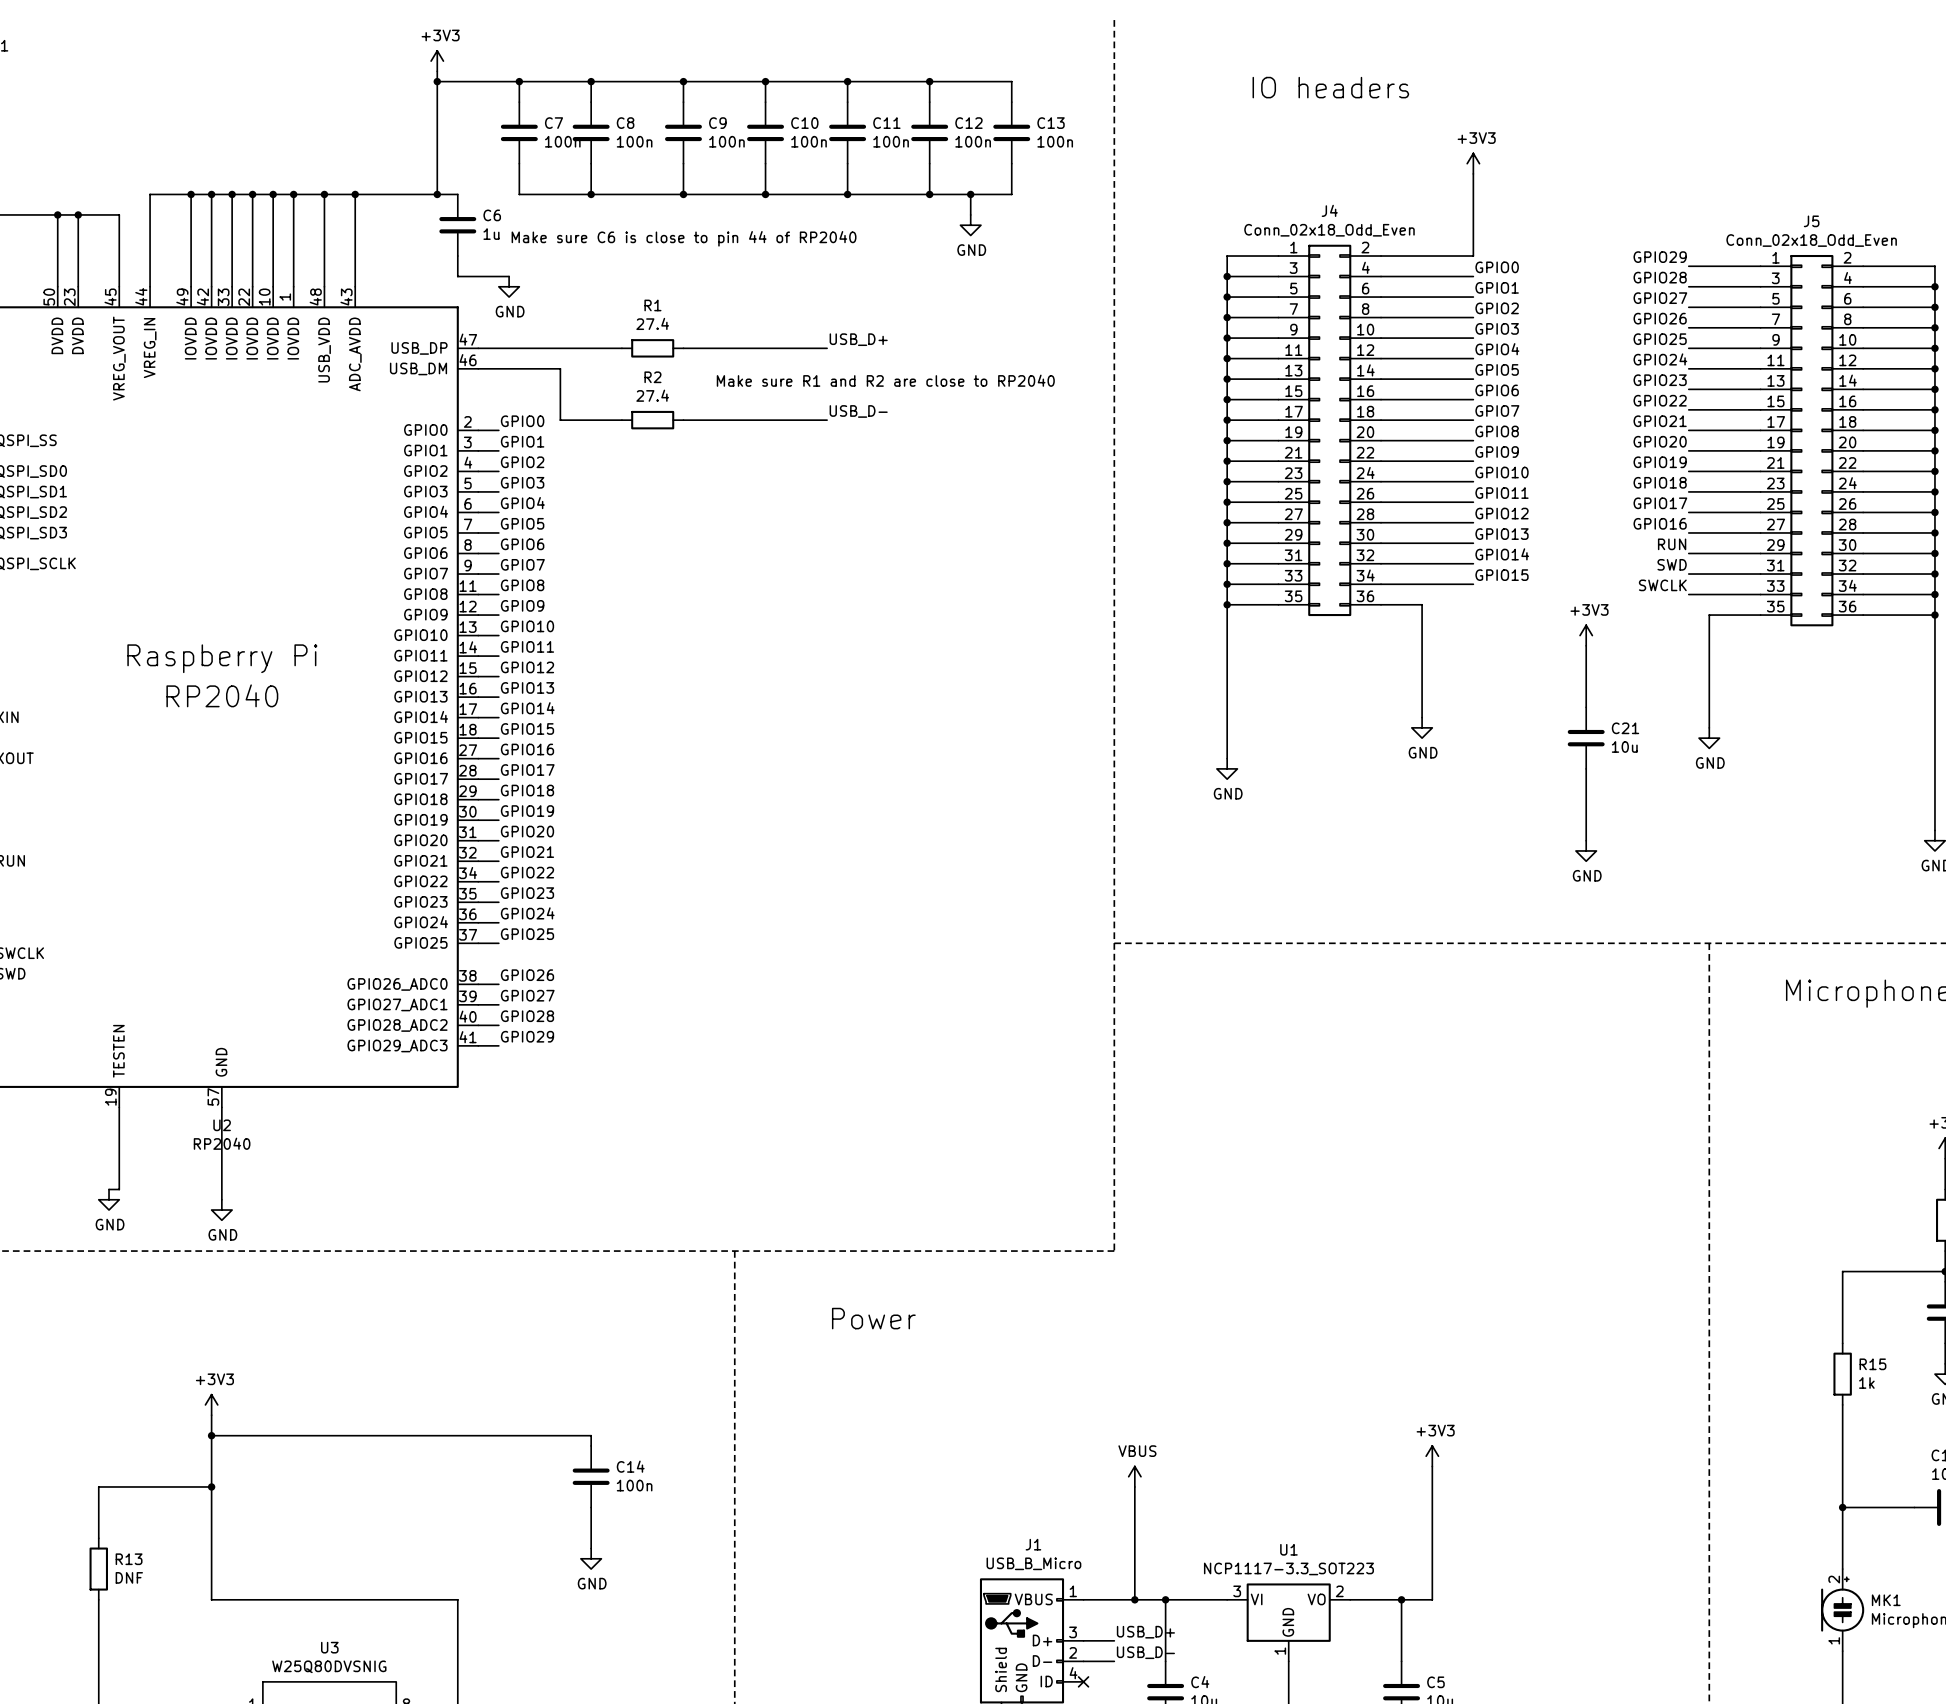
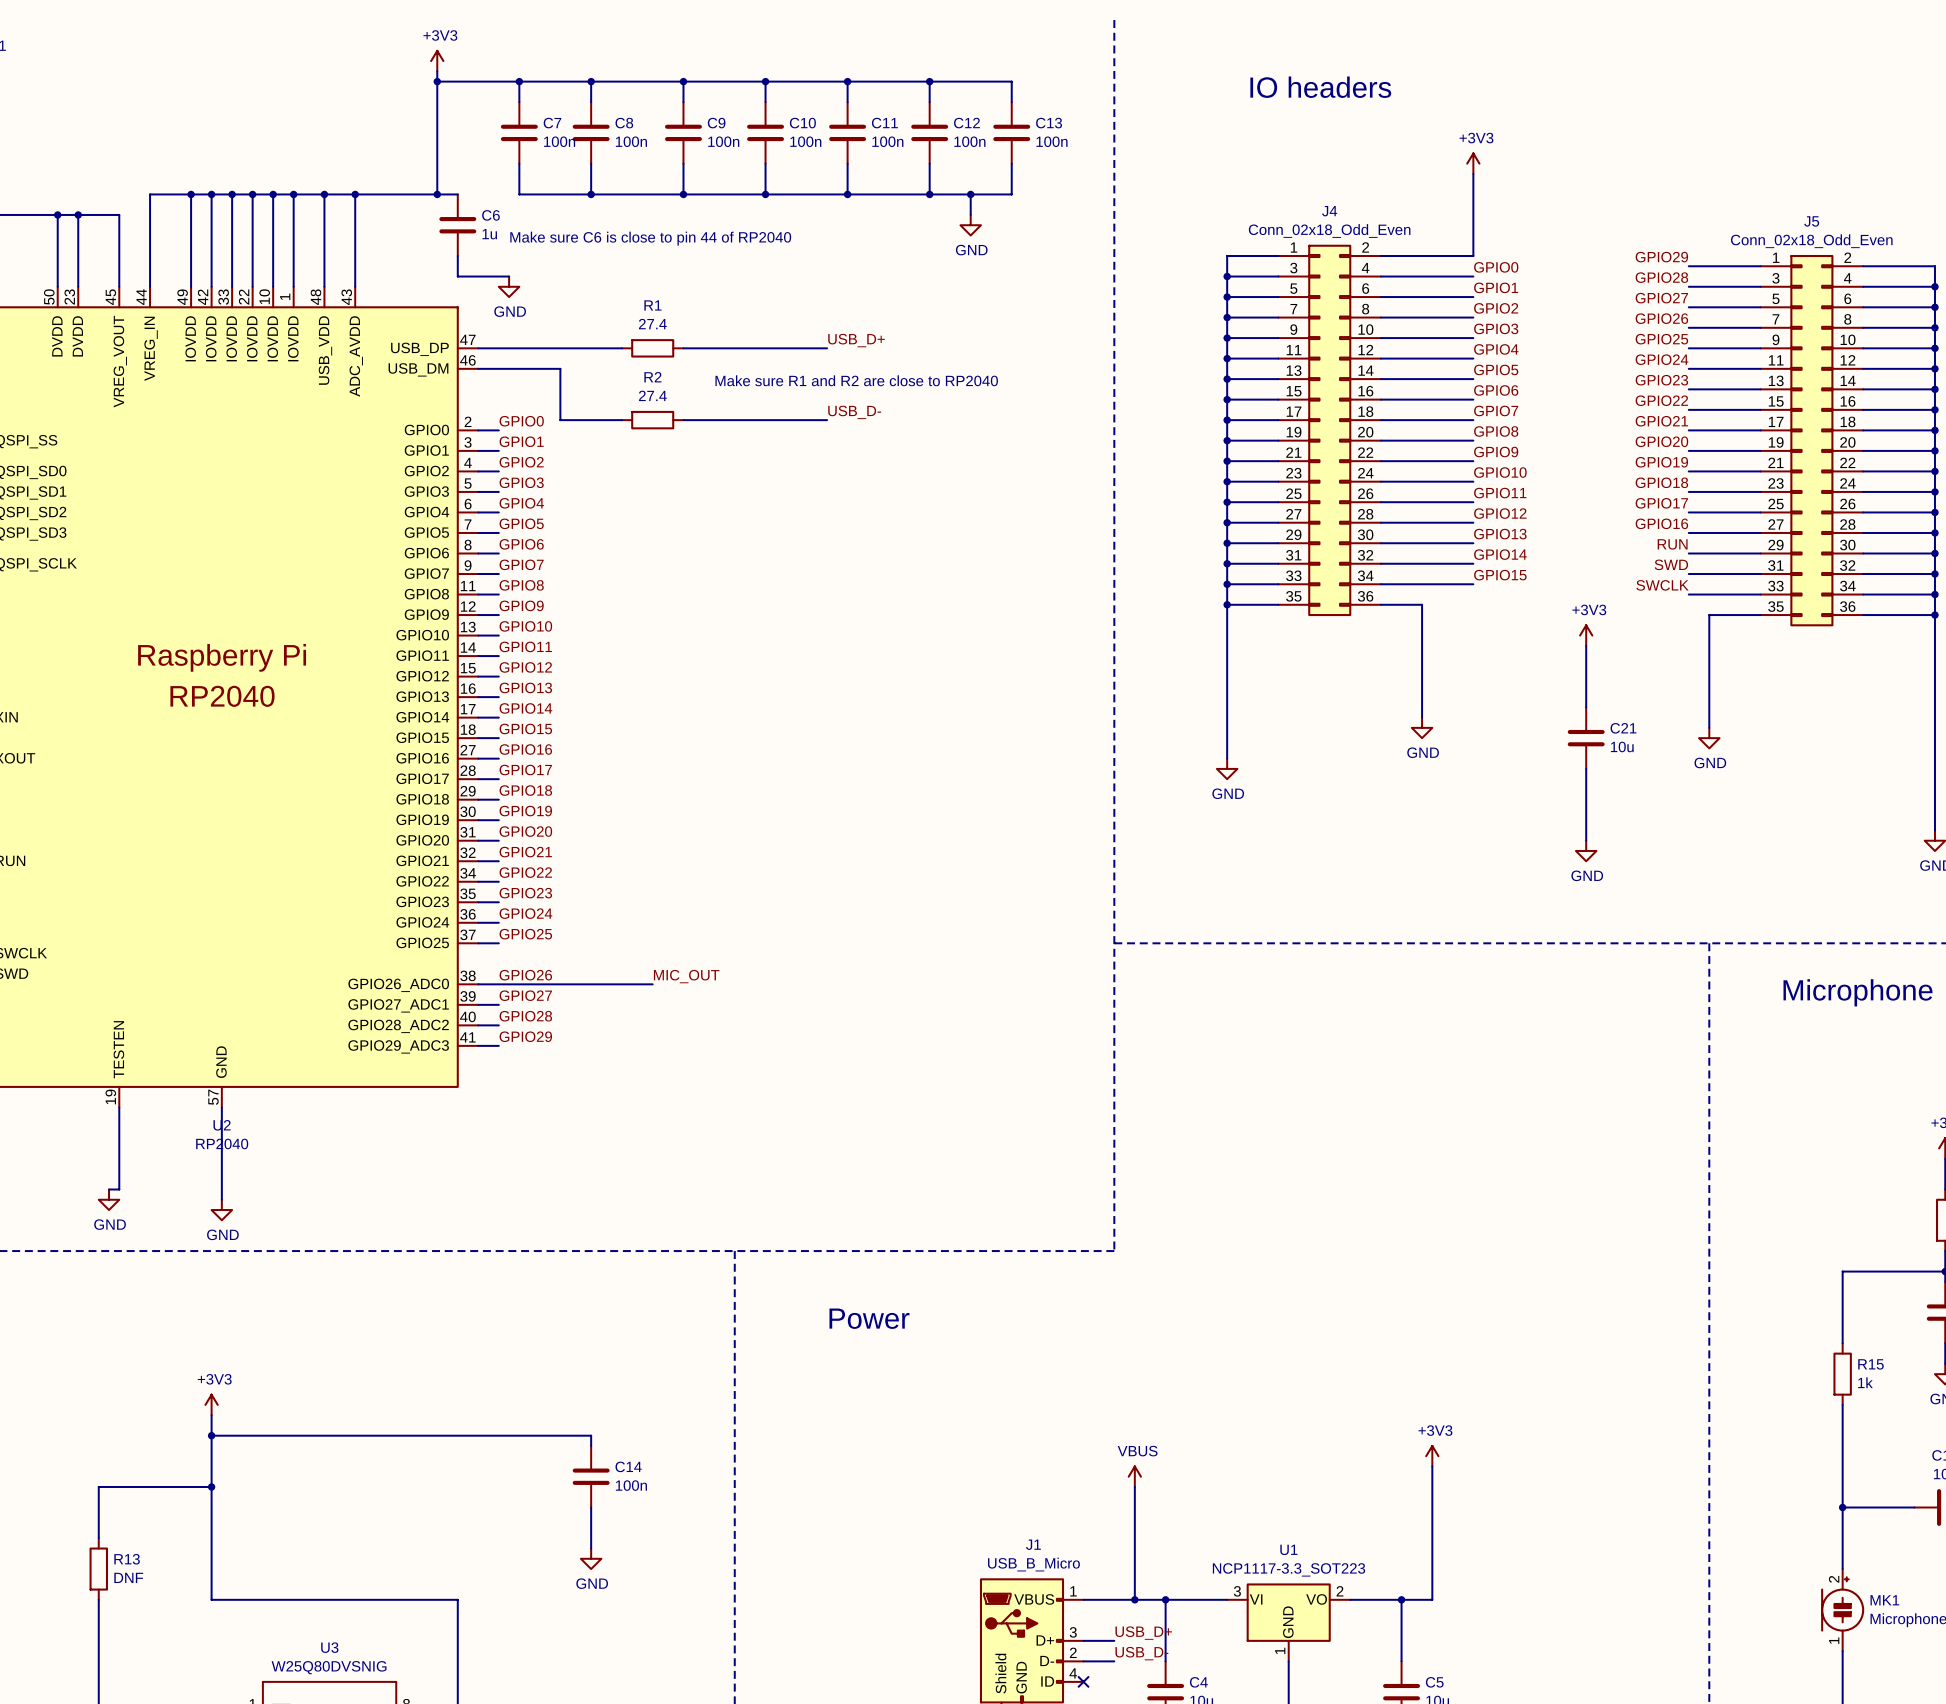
label: none -> MIC_OUT (686, 976)
wire: none -> (498, 984) (652, 984)

